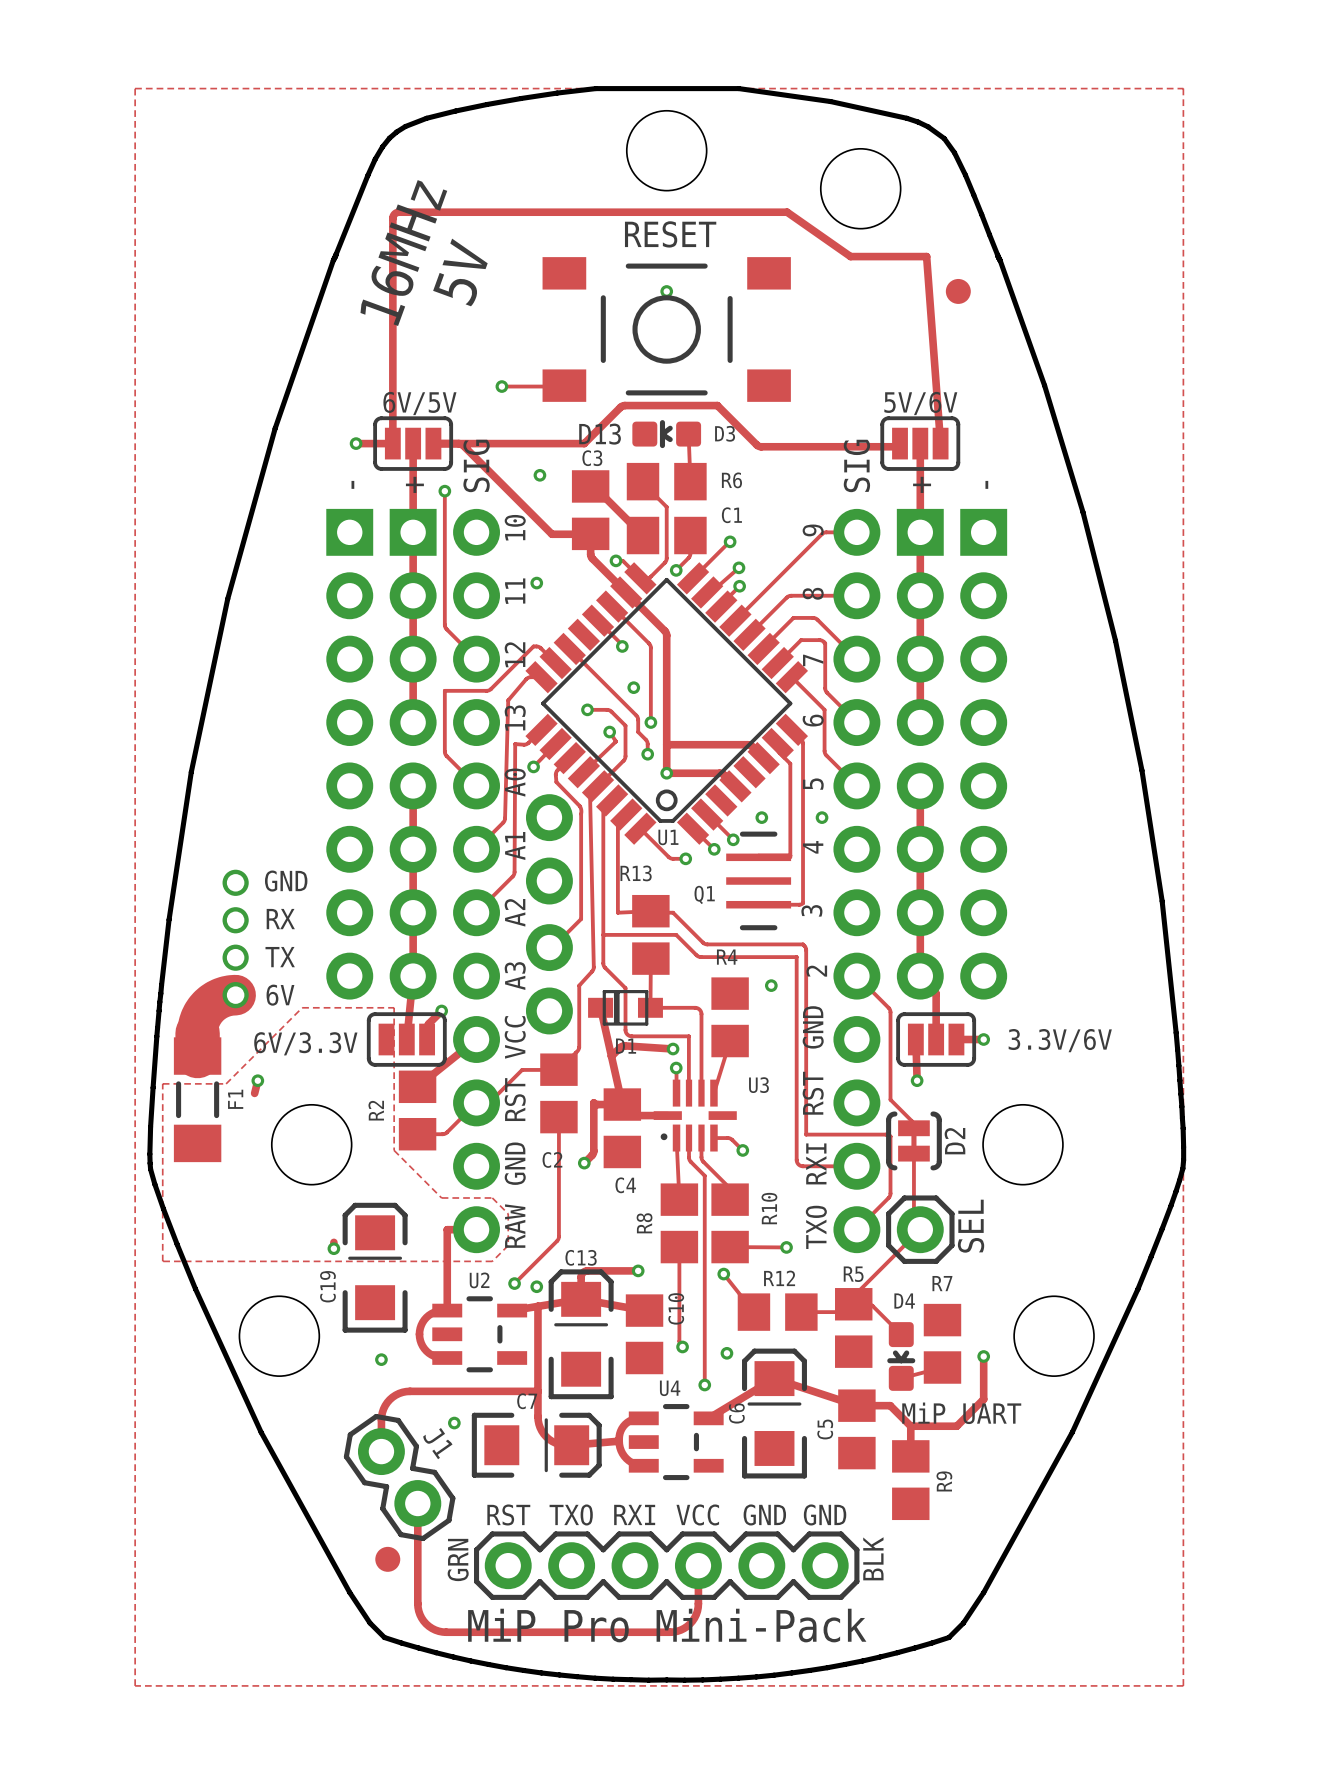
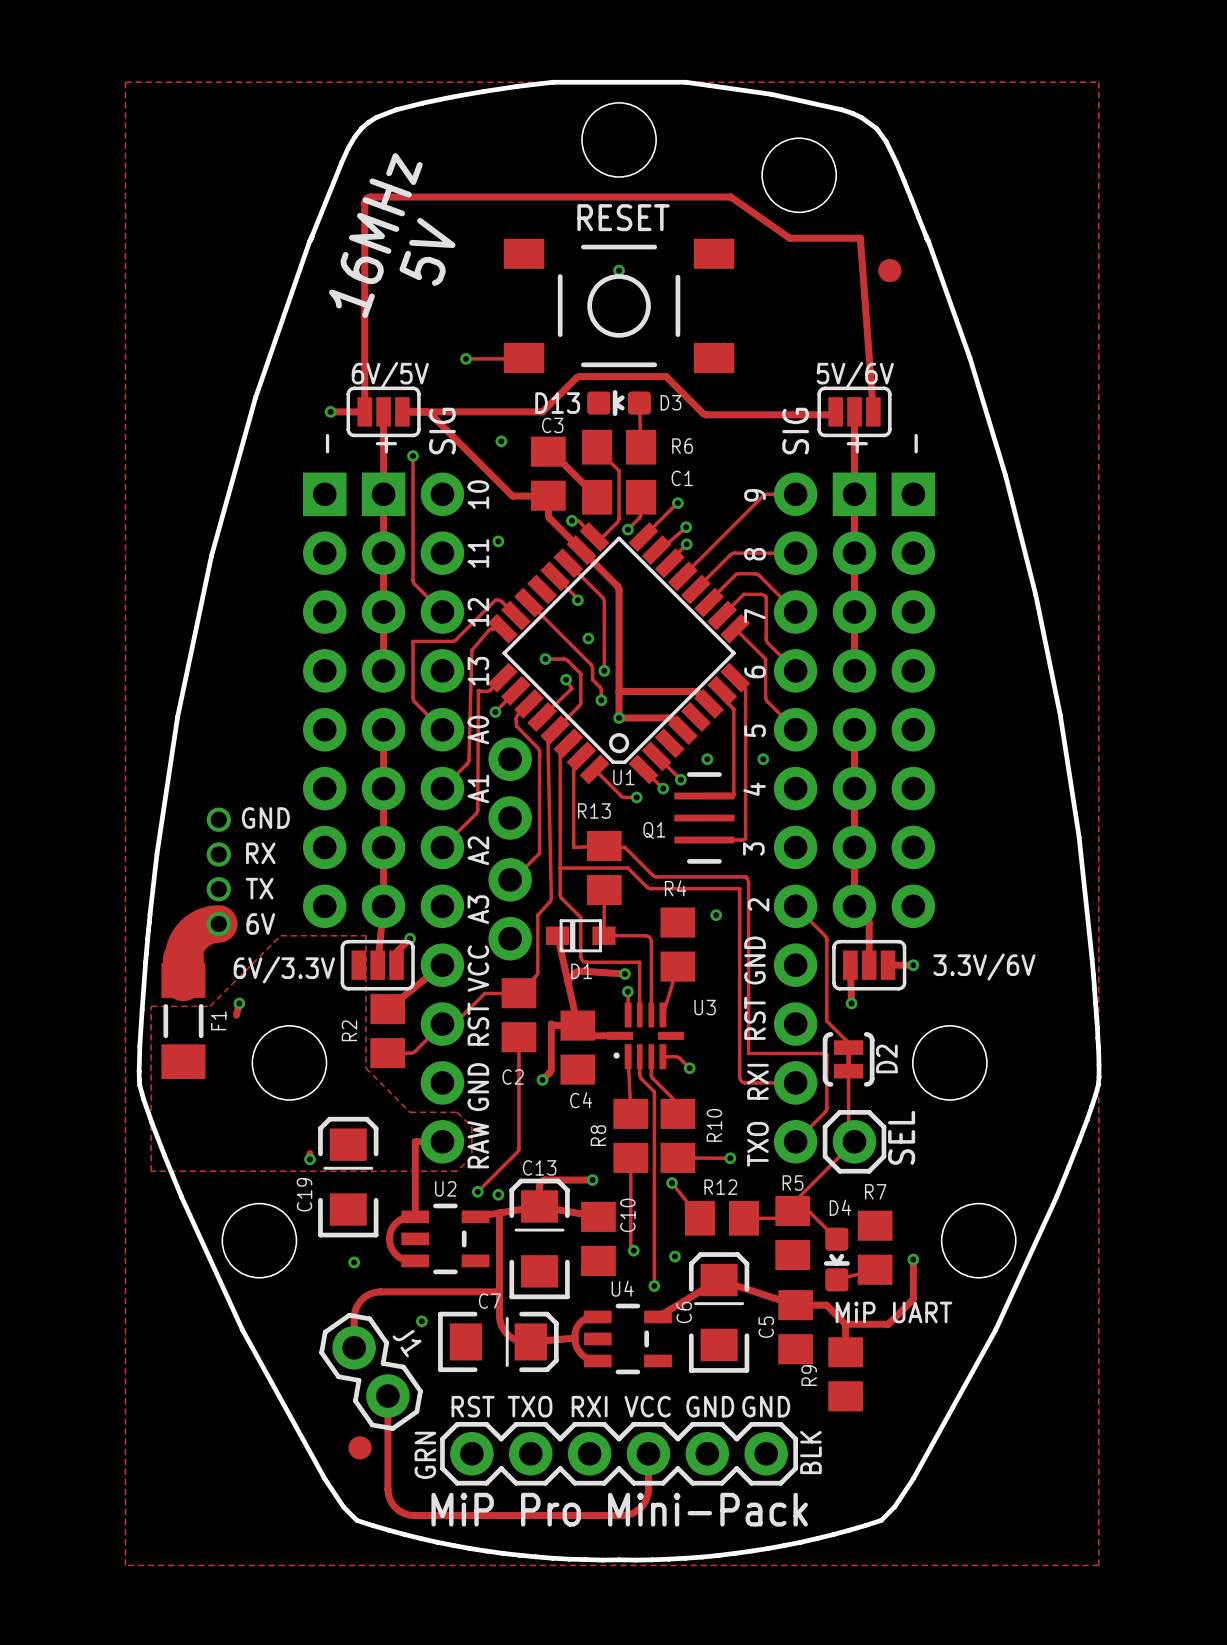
R9 name position: R9 (944, 1481) -> R9 (809, 1375)

